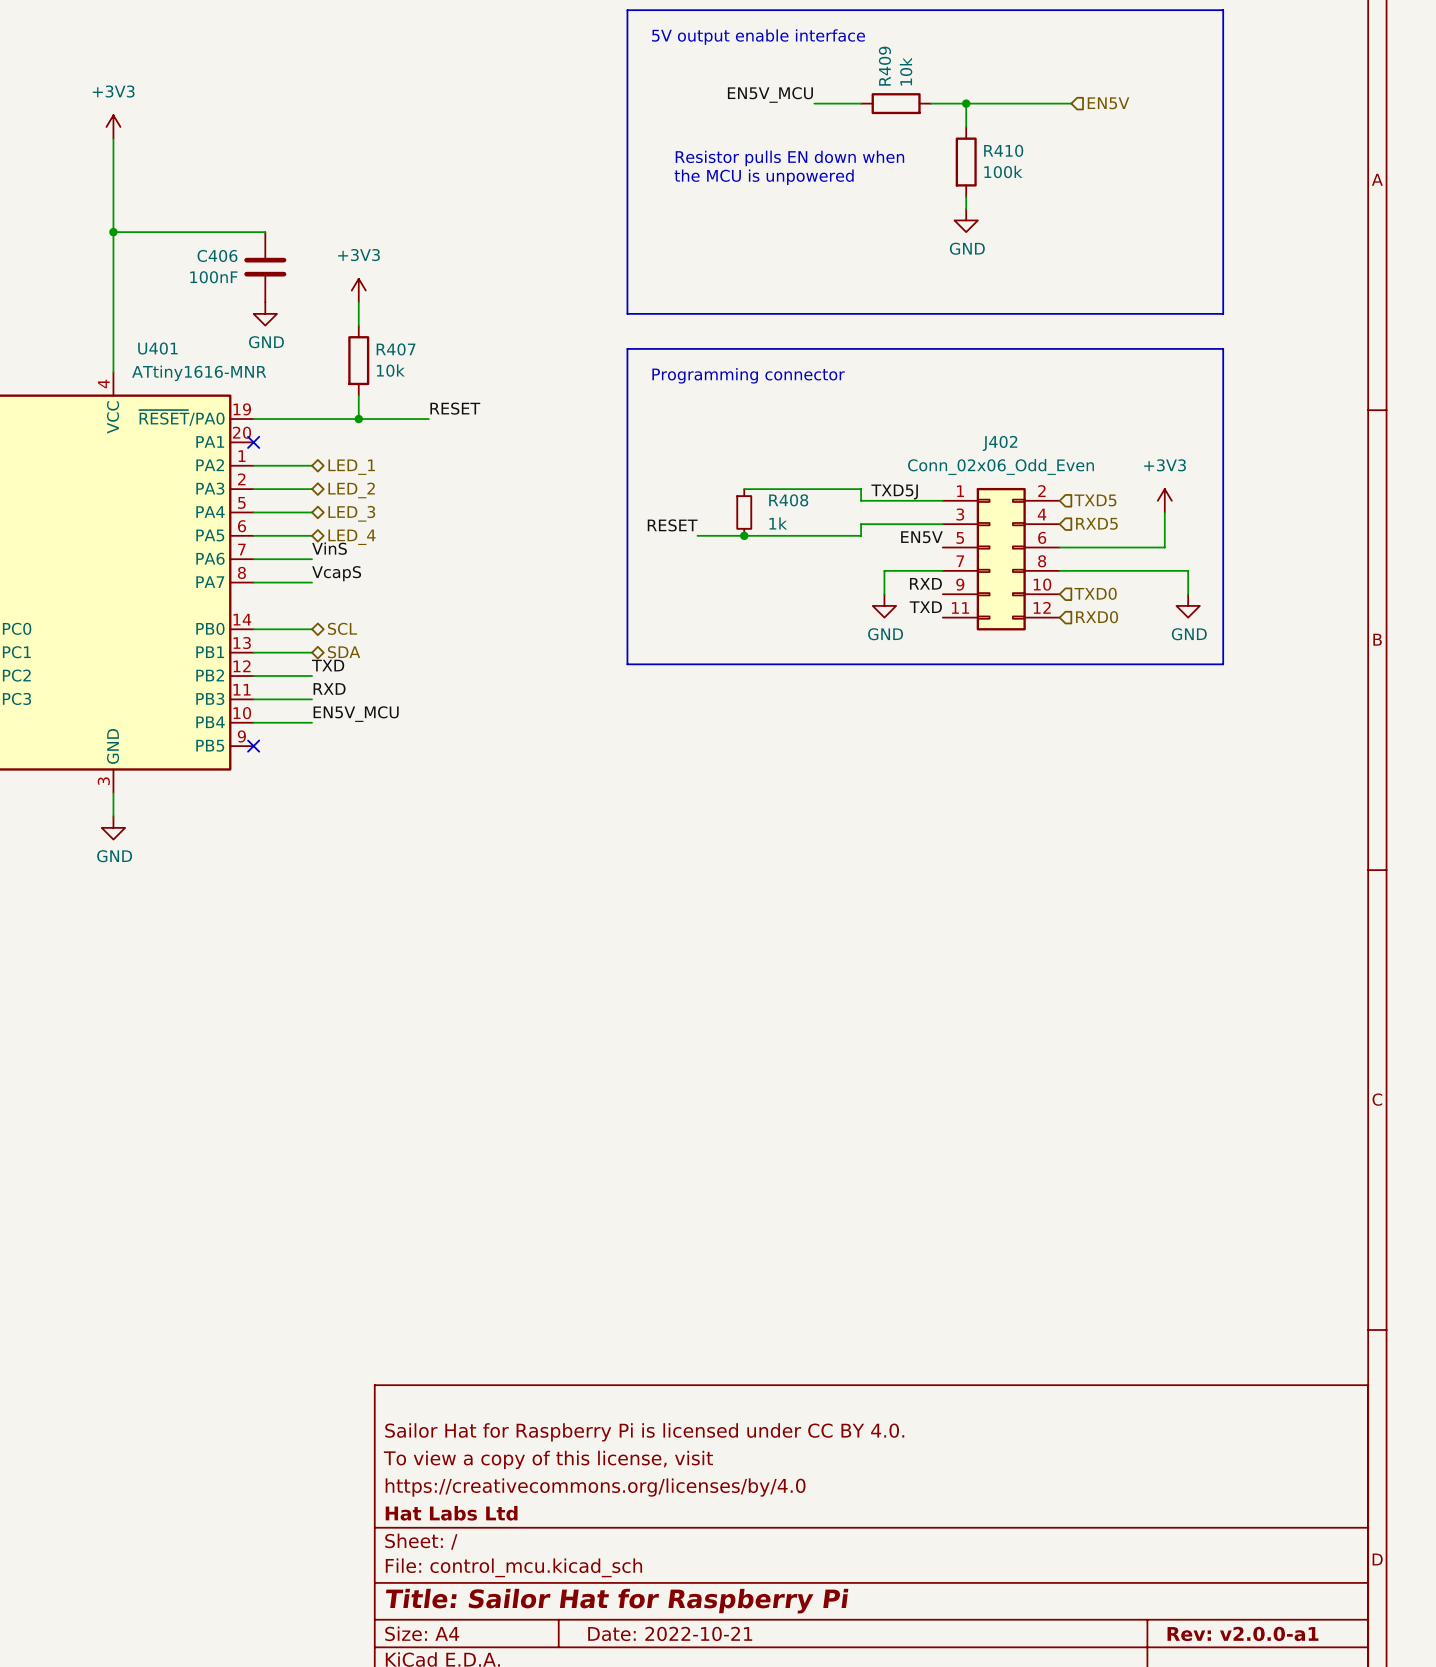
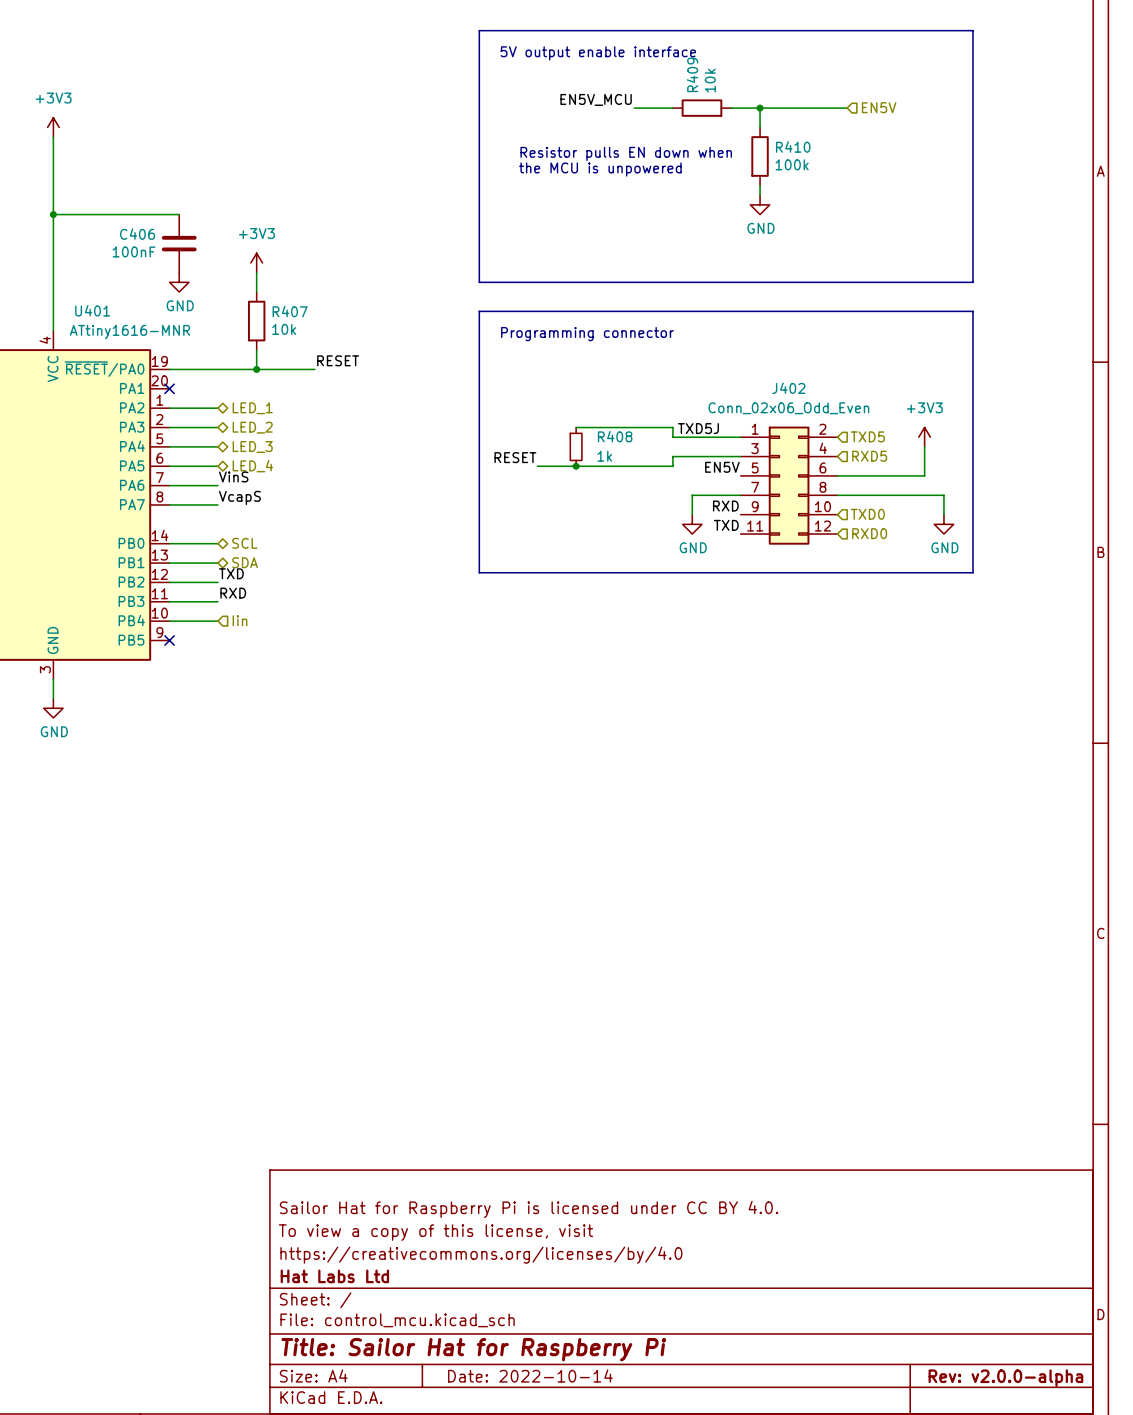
label: EN5V_MCU (356, 714) -> none
hierarchical label: none -> Iin (240, 620)
title block: Date: 2022-10-21 (670, 1633) -> Date: 2022-10-14 (530, 1375)
title block: Rev: v2.0.0-a1 (1242, 1633) -> Rev: v2.0.0-alpha (1005, 1378)

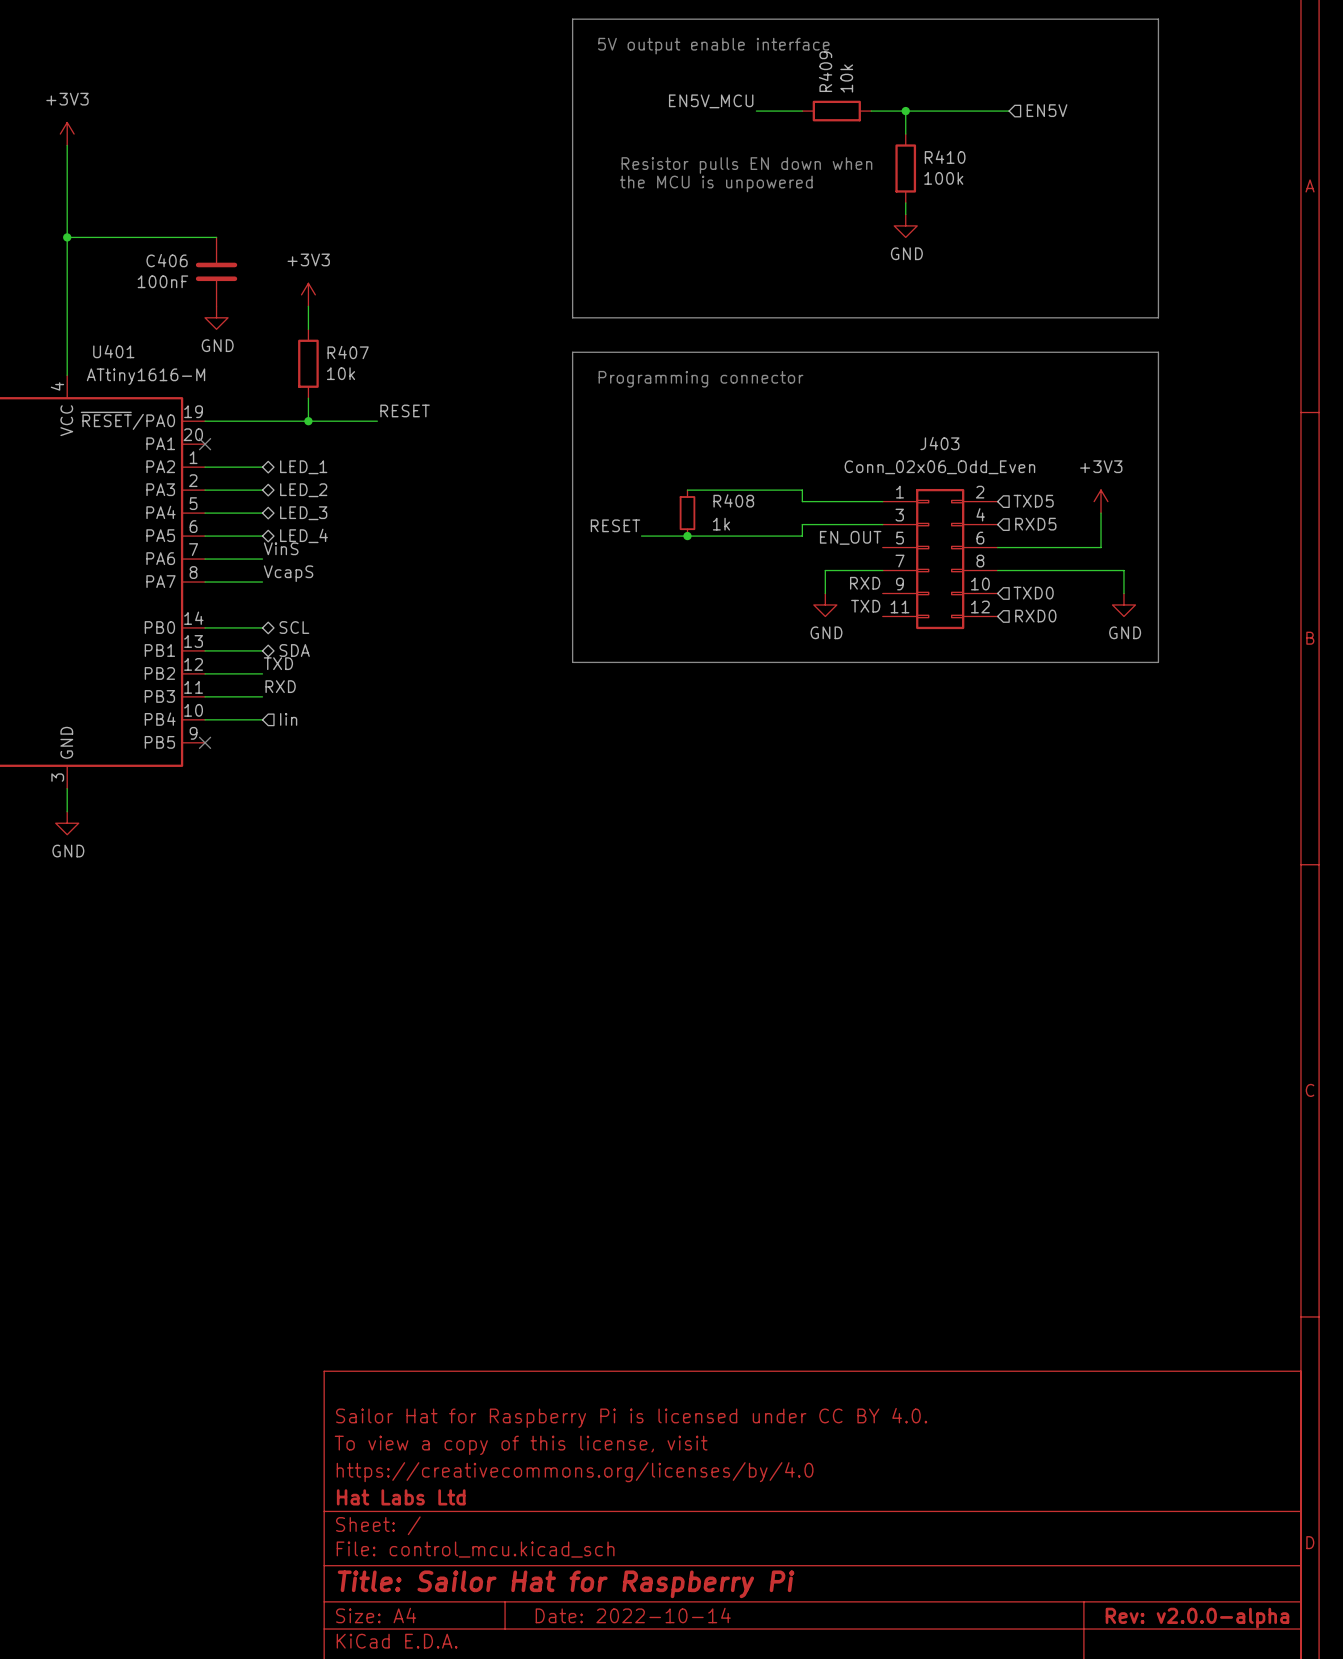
U401 value: ATtiny1616-MNR (129, 331) -> ATtiny1616-M (146, 376)
J402 name: J402 (788, 388) -> J403 (939, 443)
label: TXD5J (698, 428) -> none
label: EN5V (722, 467) -> EN_OUT (850, 537)

